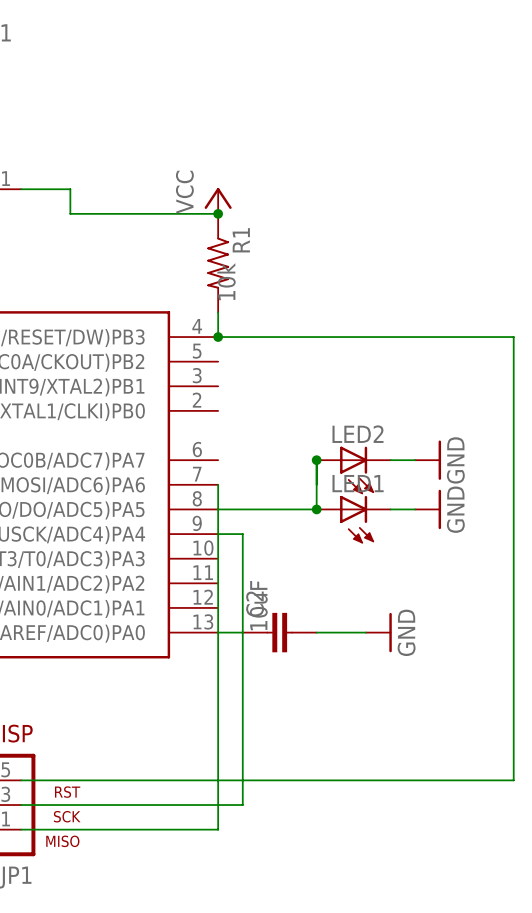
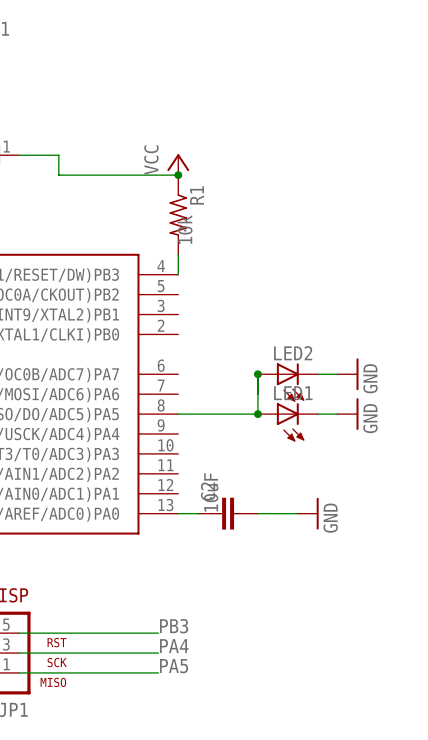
wire: (218, 337) (513, 337) (513, 780) (193, 780) -> none
junction: (218, 337) -> none
wire: (218, 484) (218, 829) (193, 829) -> none
wire: (218, 534) (242, 534) (242, 805) (193, 805) -> none
label: none -> PB3 (174, 626)
label: none -> PA4 (174, 646)
label: none -> PA5 (174, 666)

